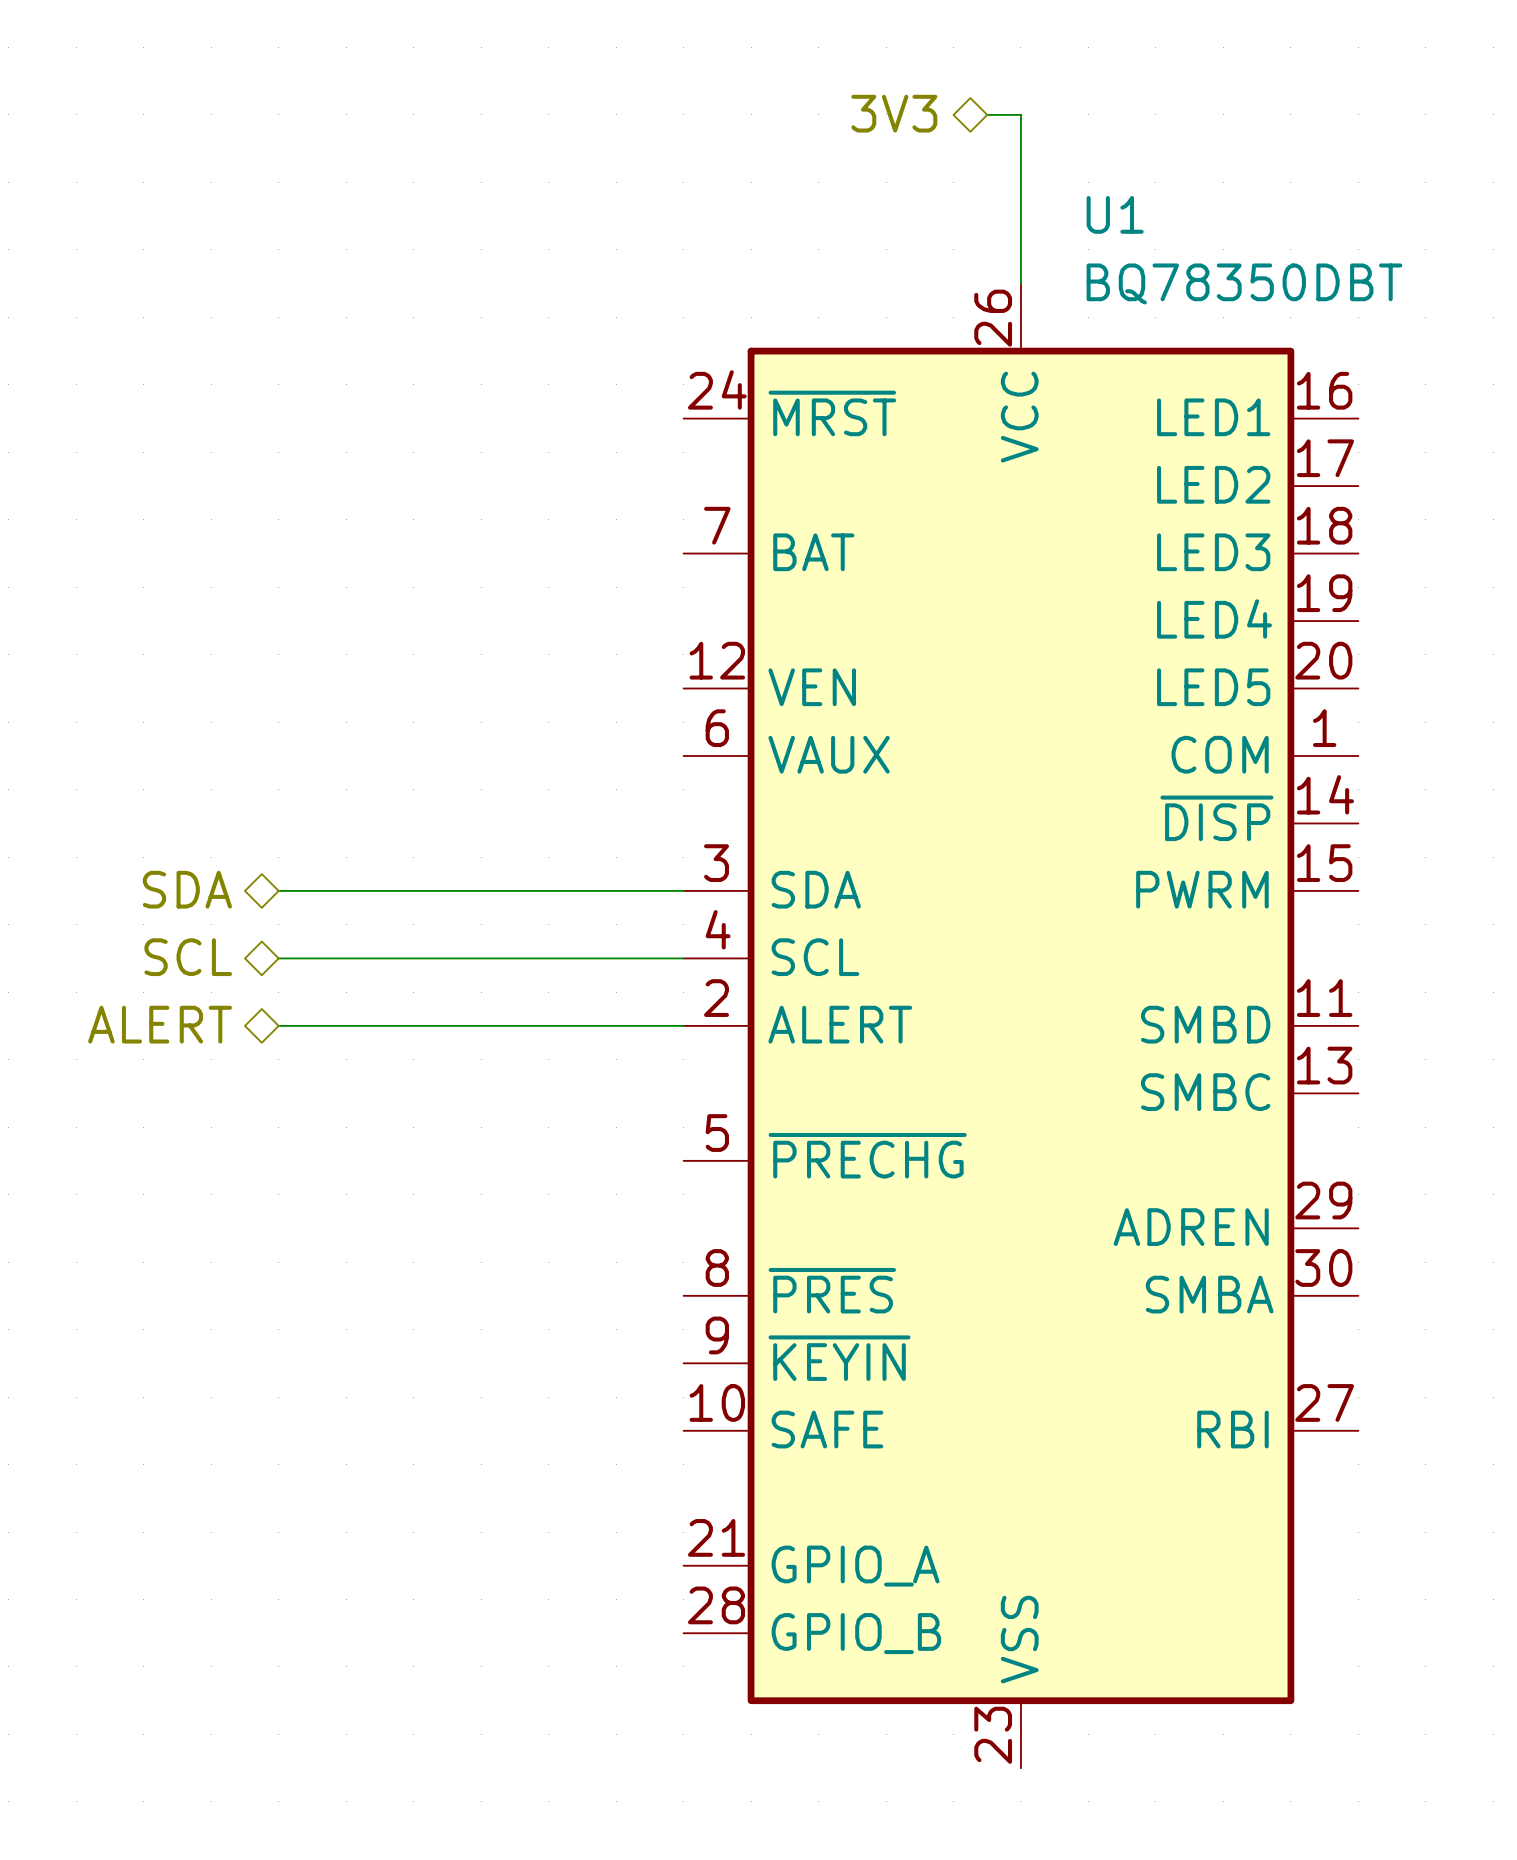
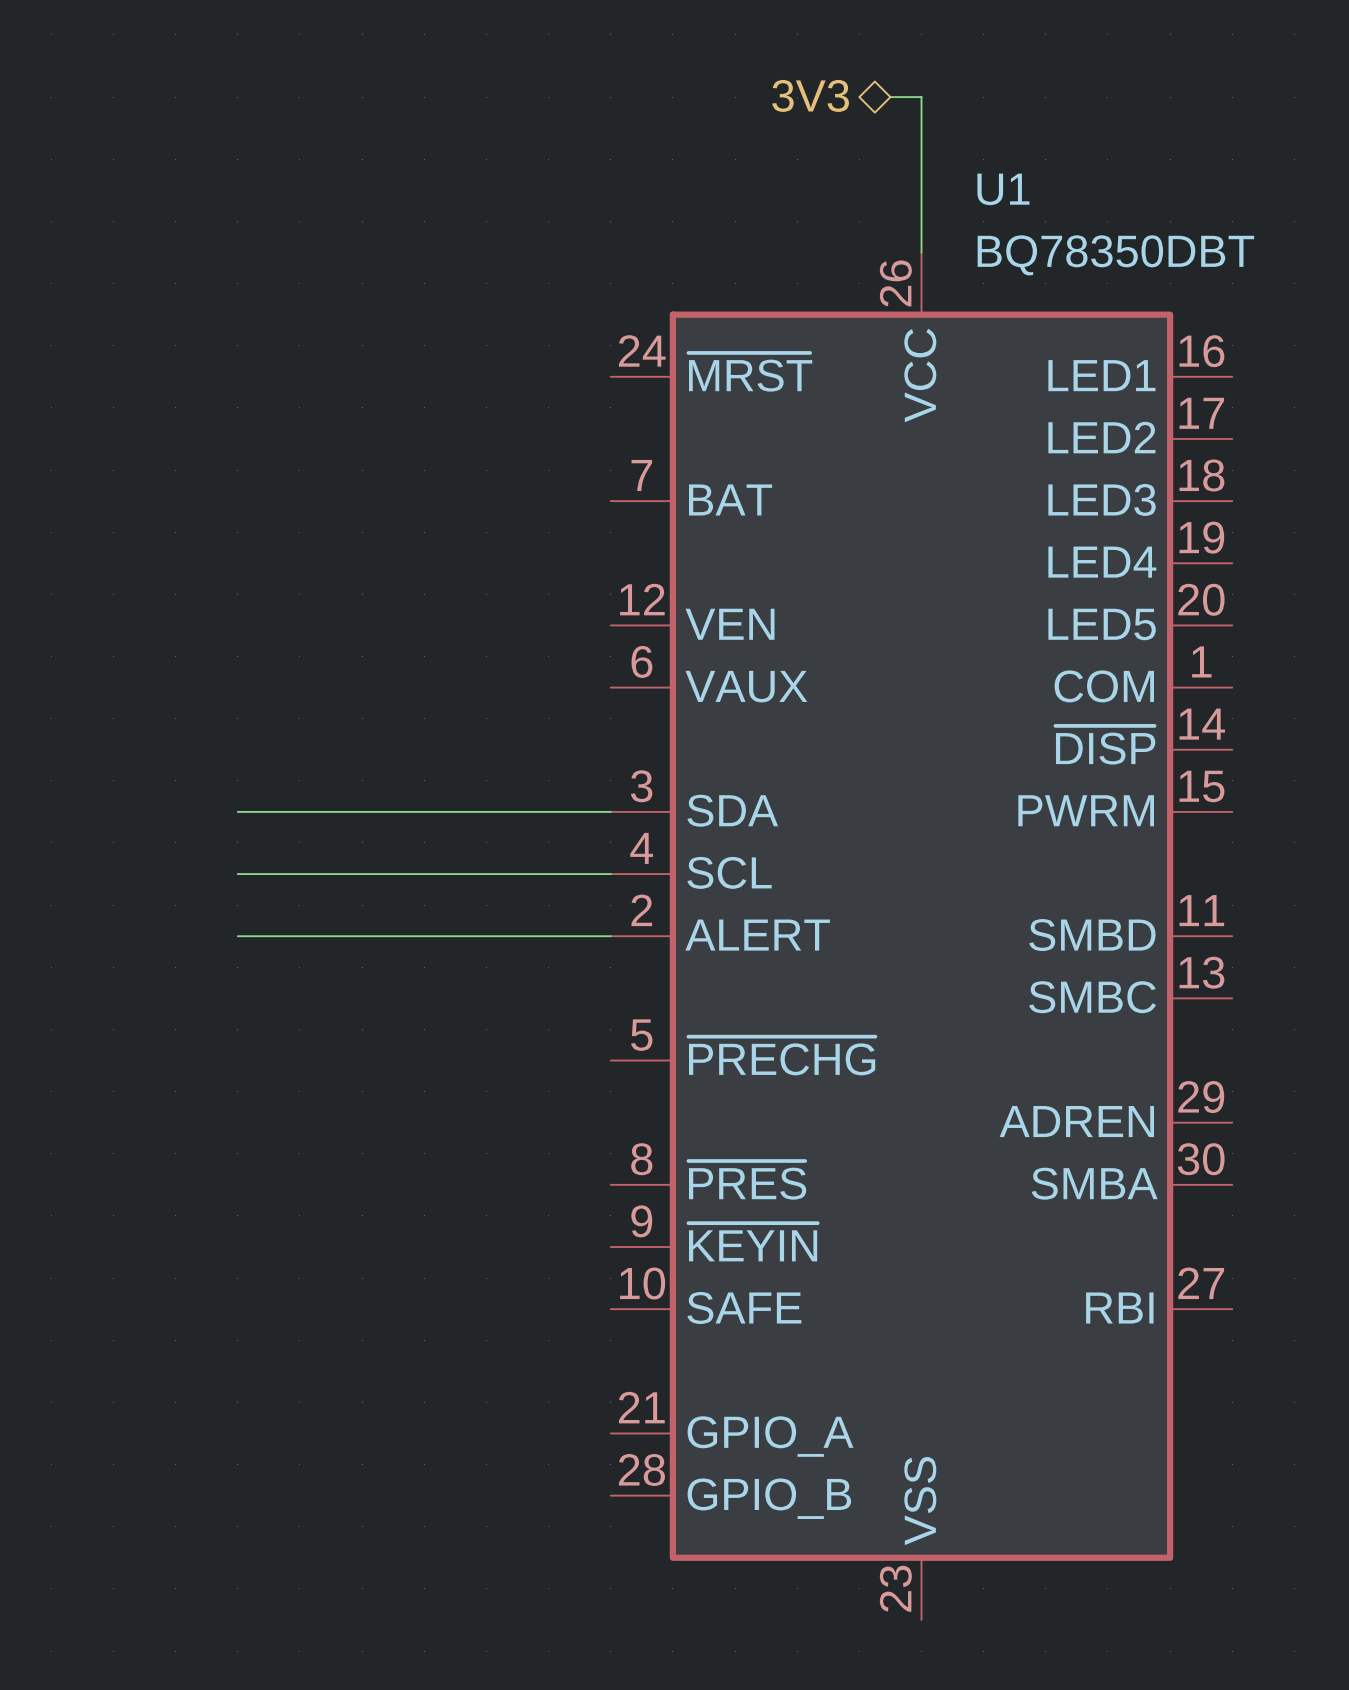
hierarchical label: SDA (187, 889) -> none
hierarchical label: SCL (188, 957) -> none
hierarchical label: ALERT (160, 1024) -> none

